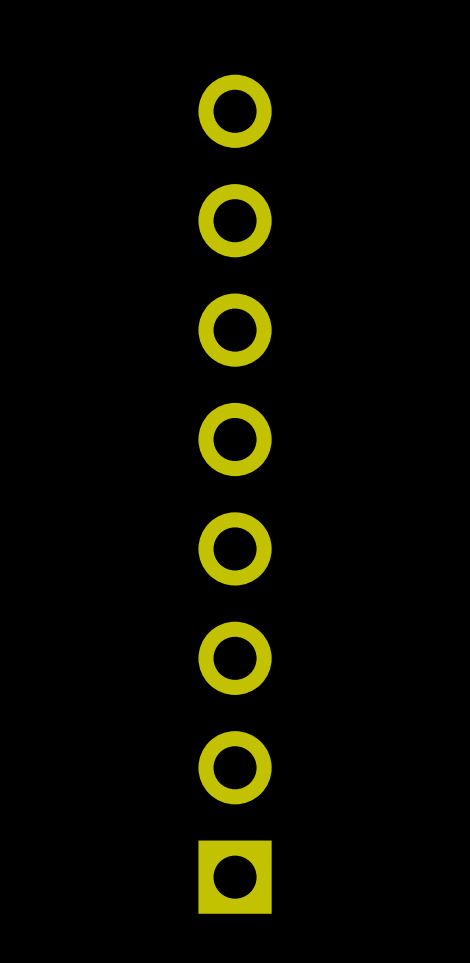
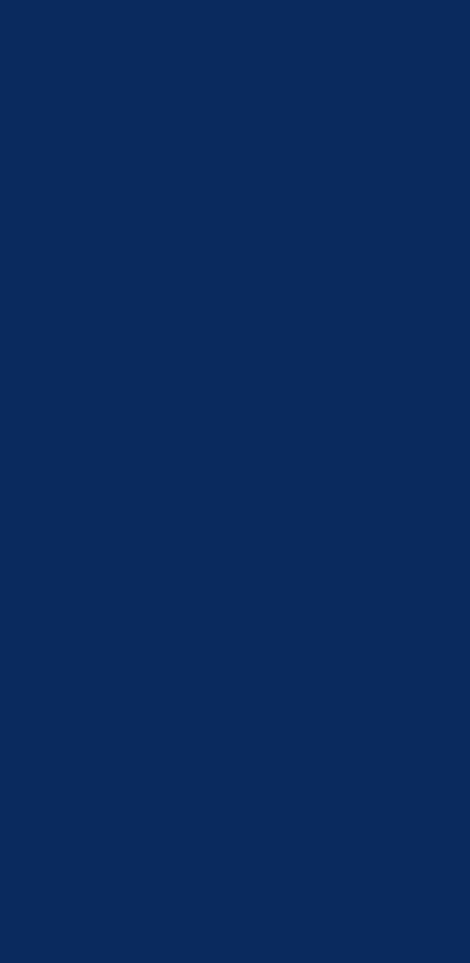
part: (235, 494) -> none

